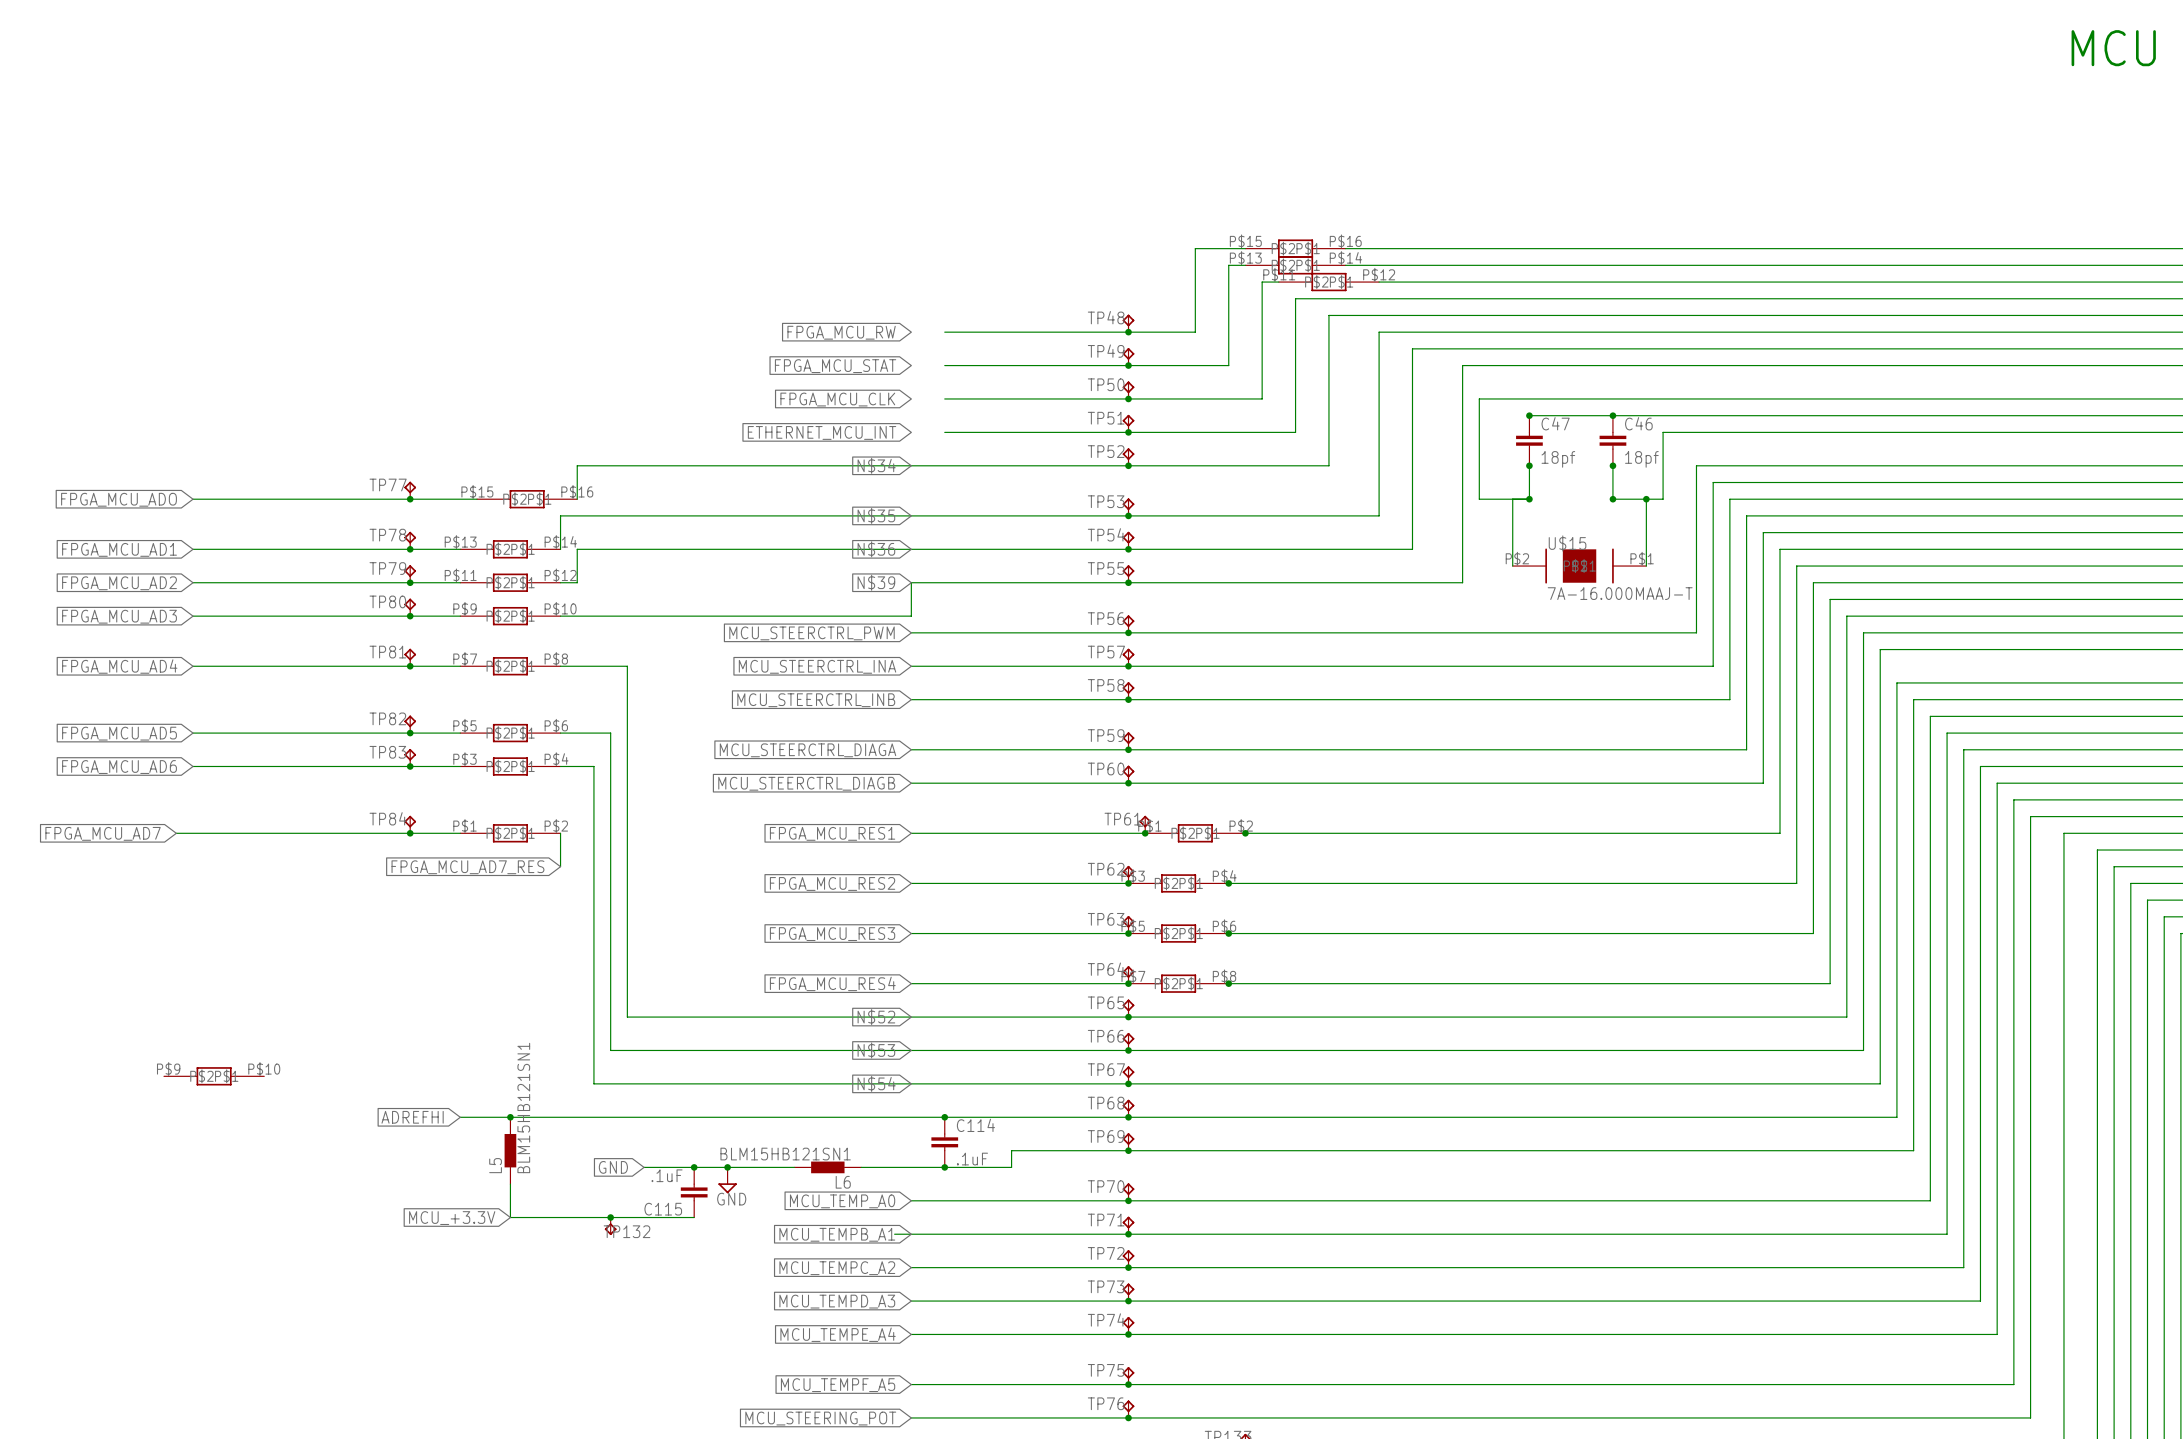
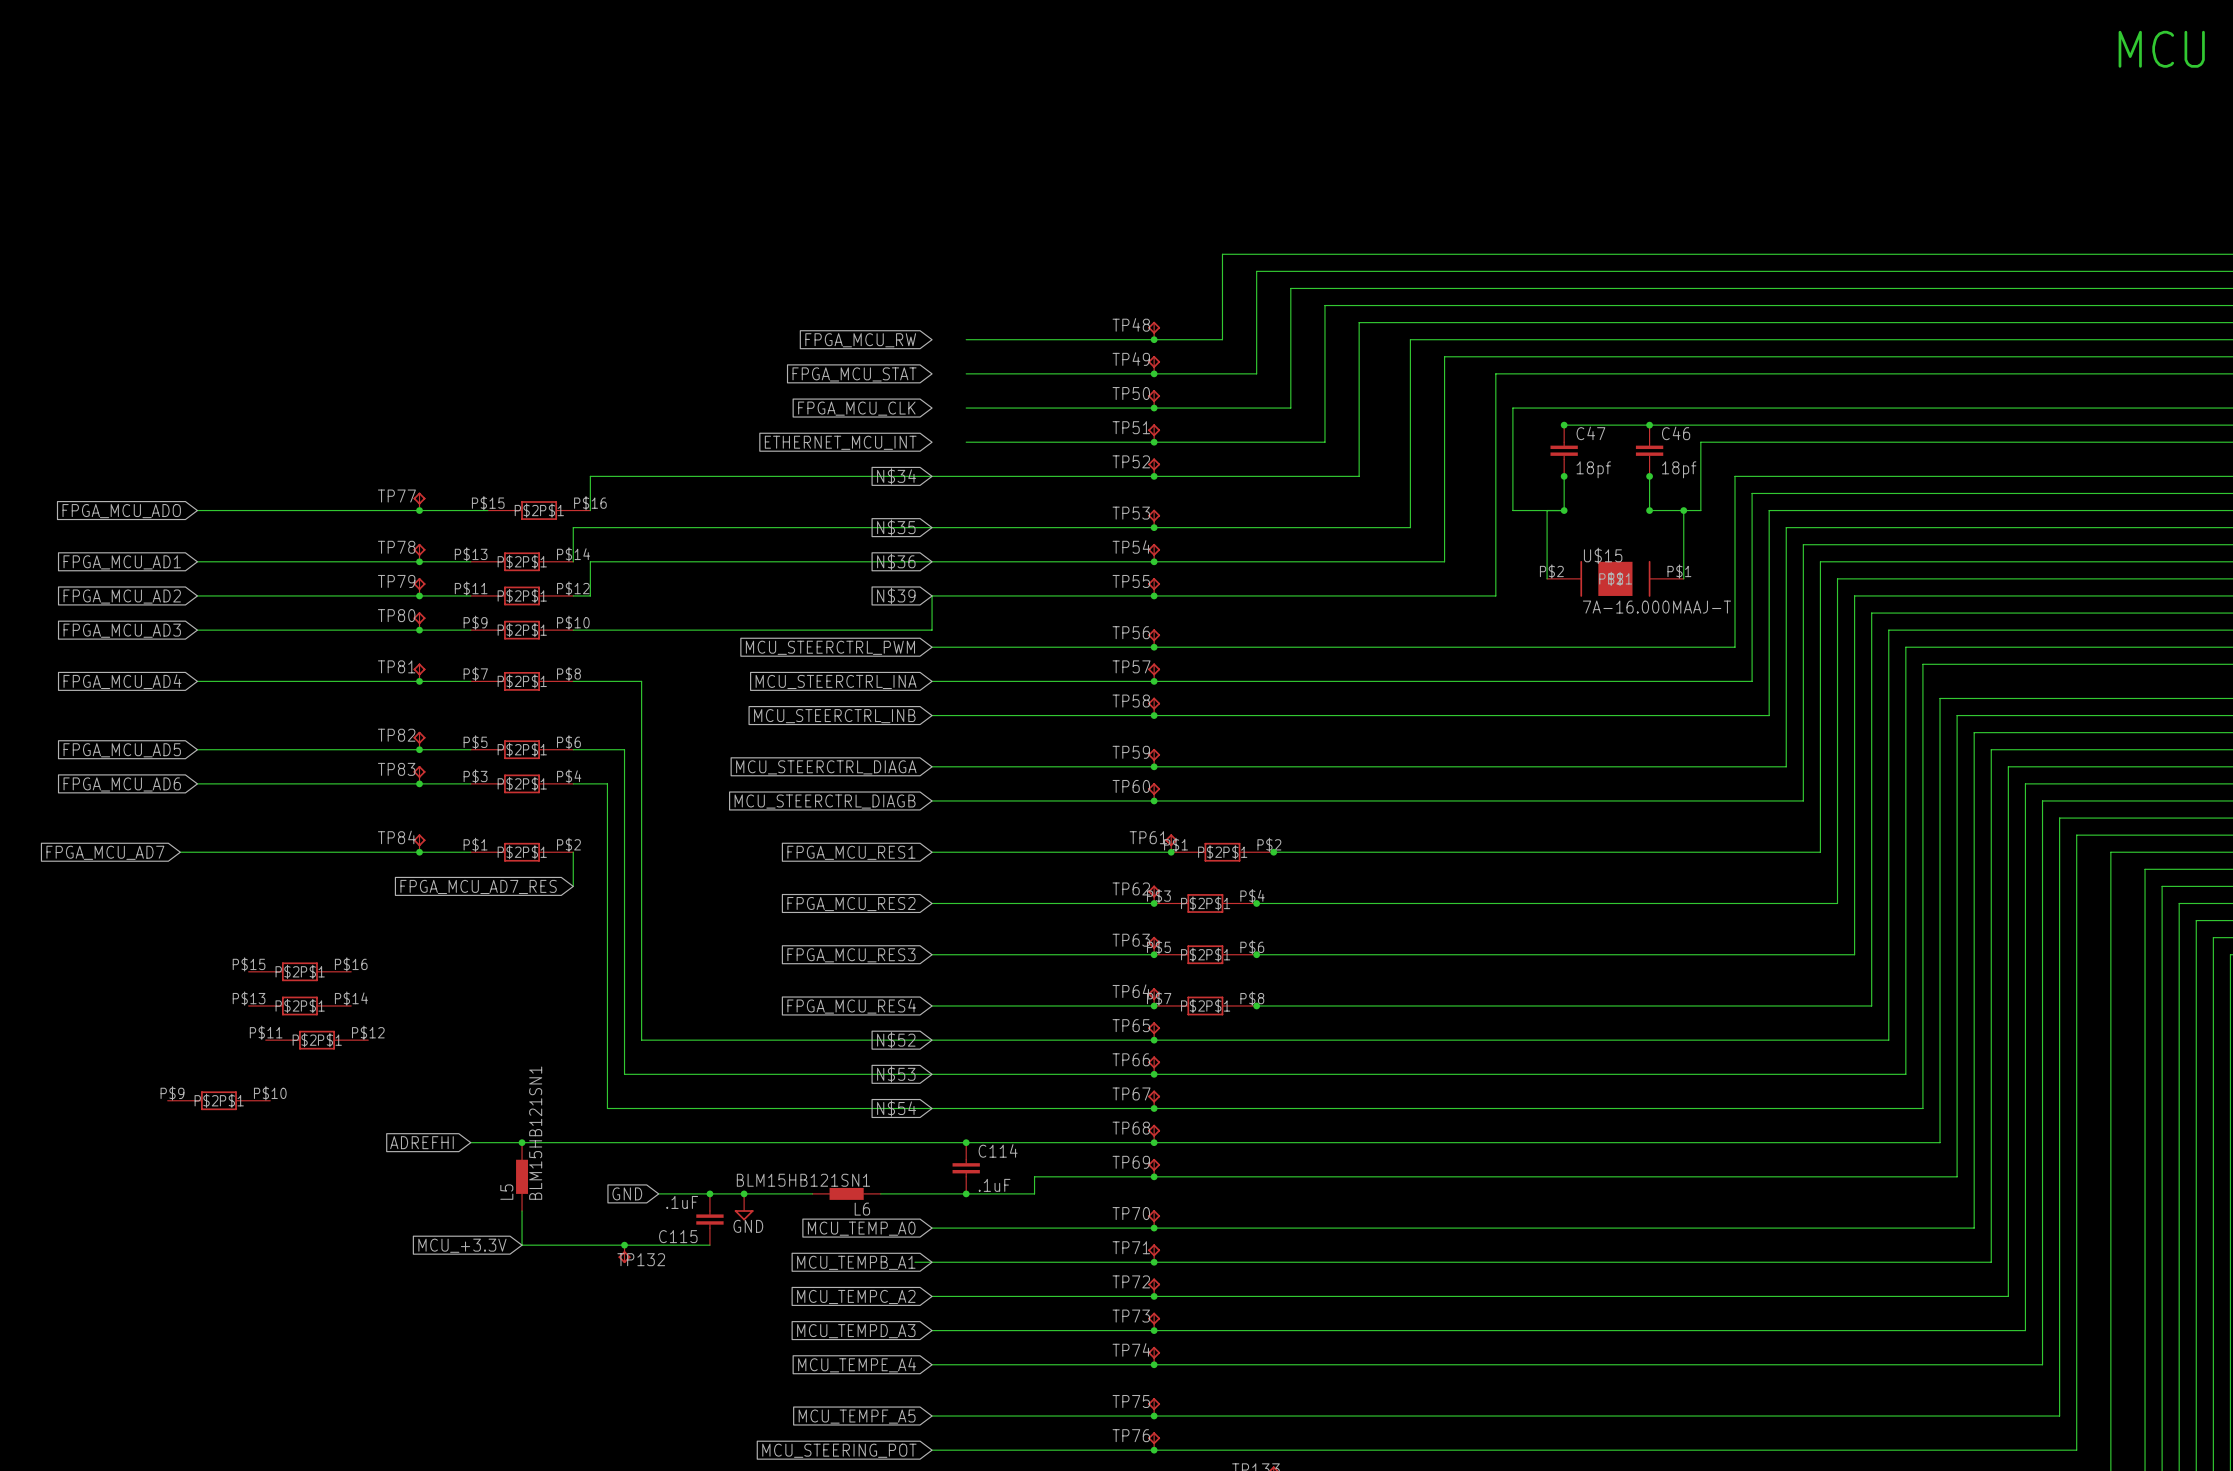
part: (1295, 248) -> none
part: (1295, 265) -> none
part: (1328, 282) -> none
part: none -> (299, 971)
part: none -> (299, 1005)
part: none -> (317, 1040)

